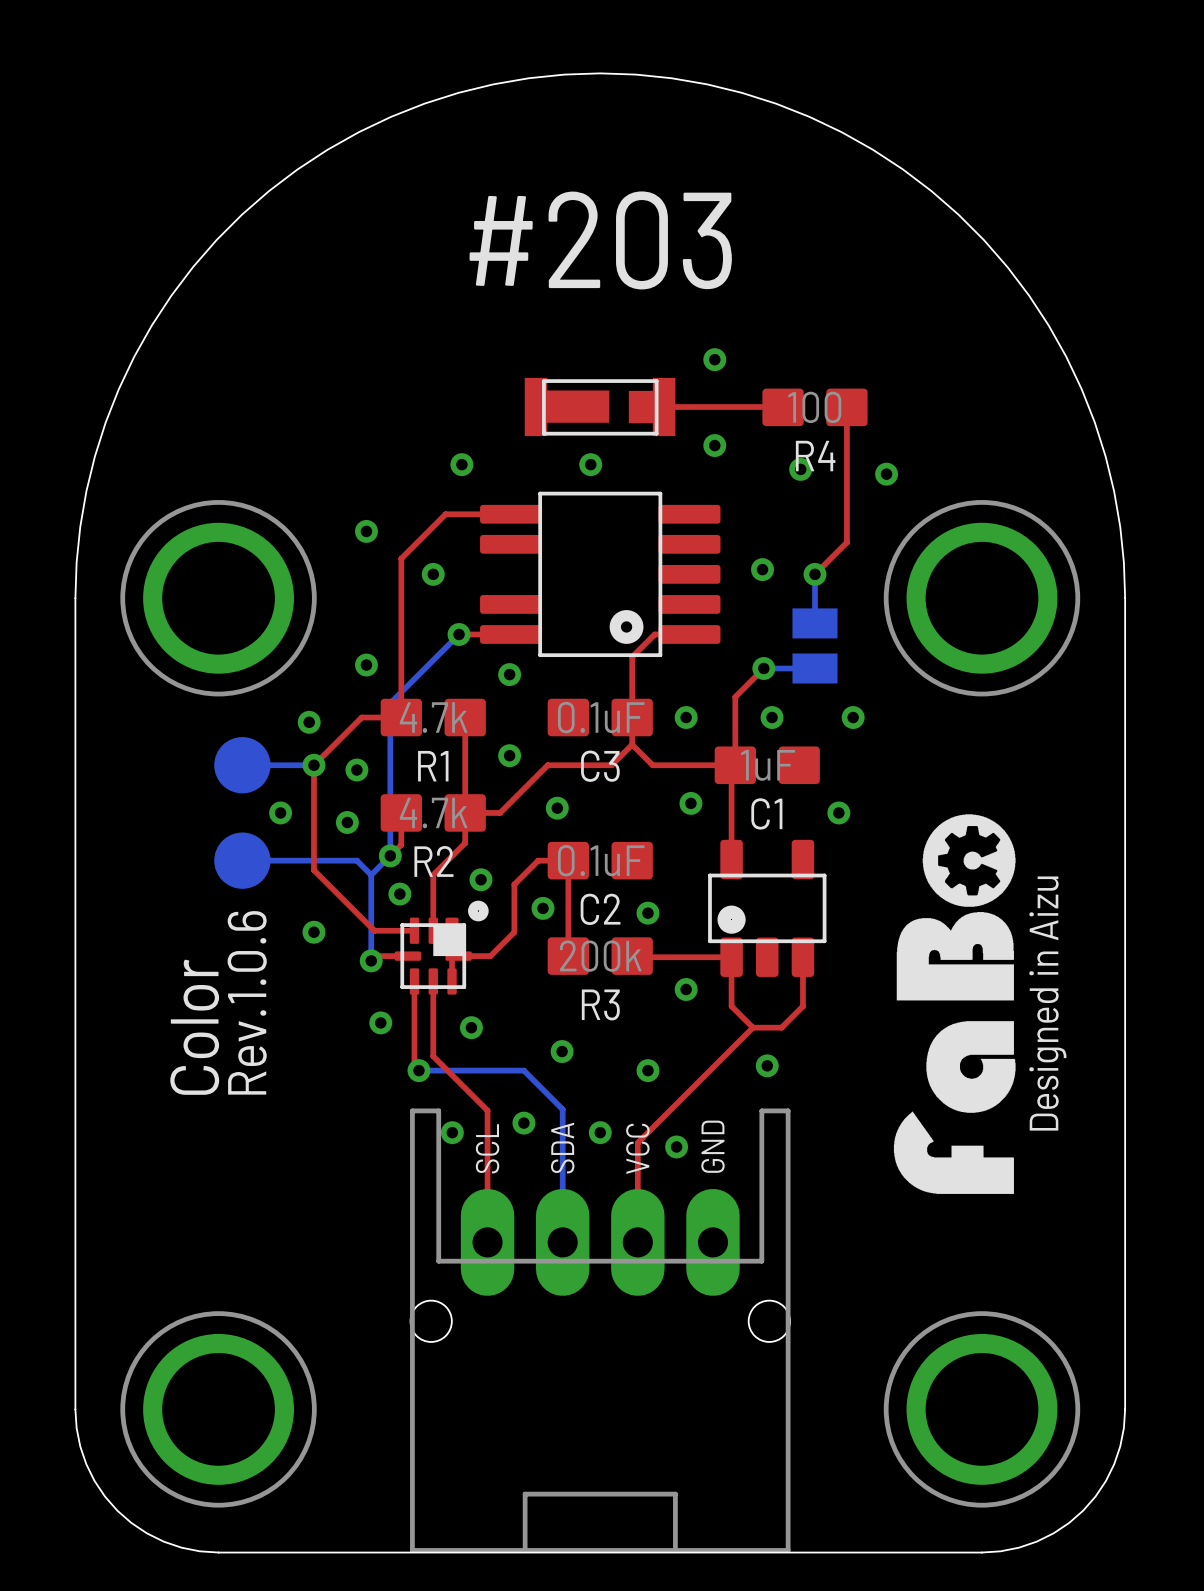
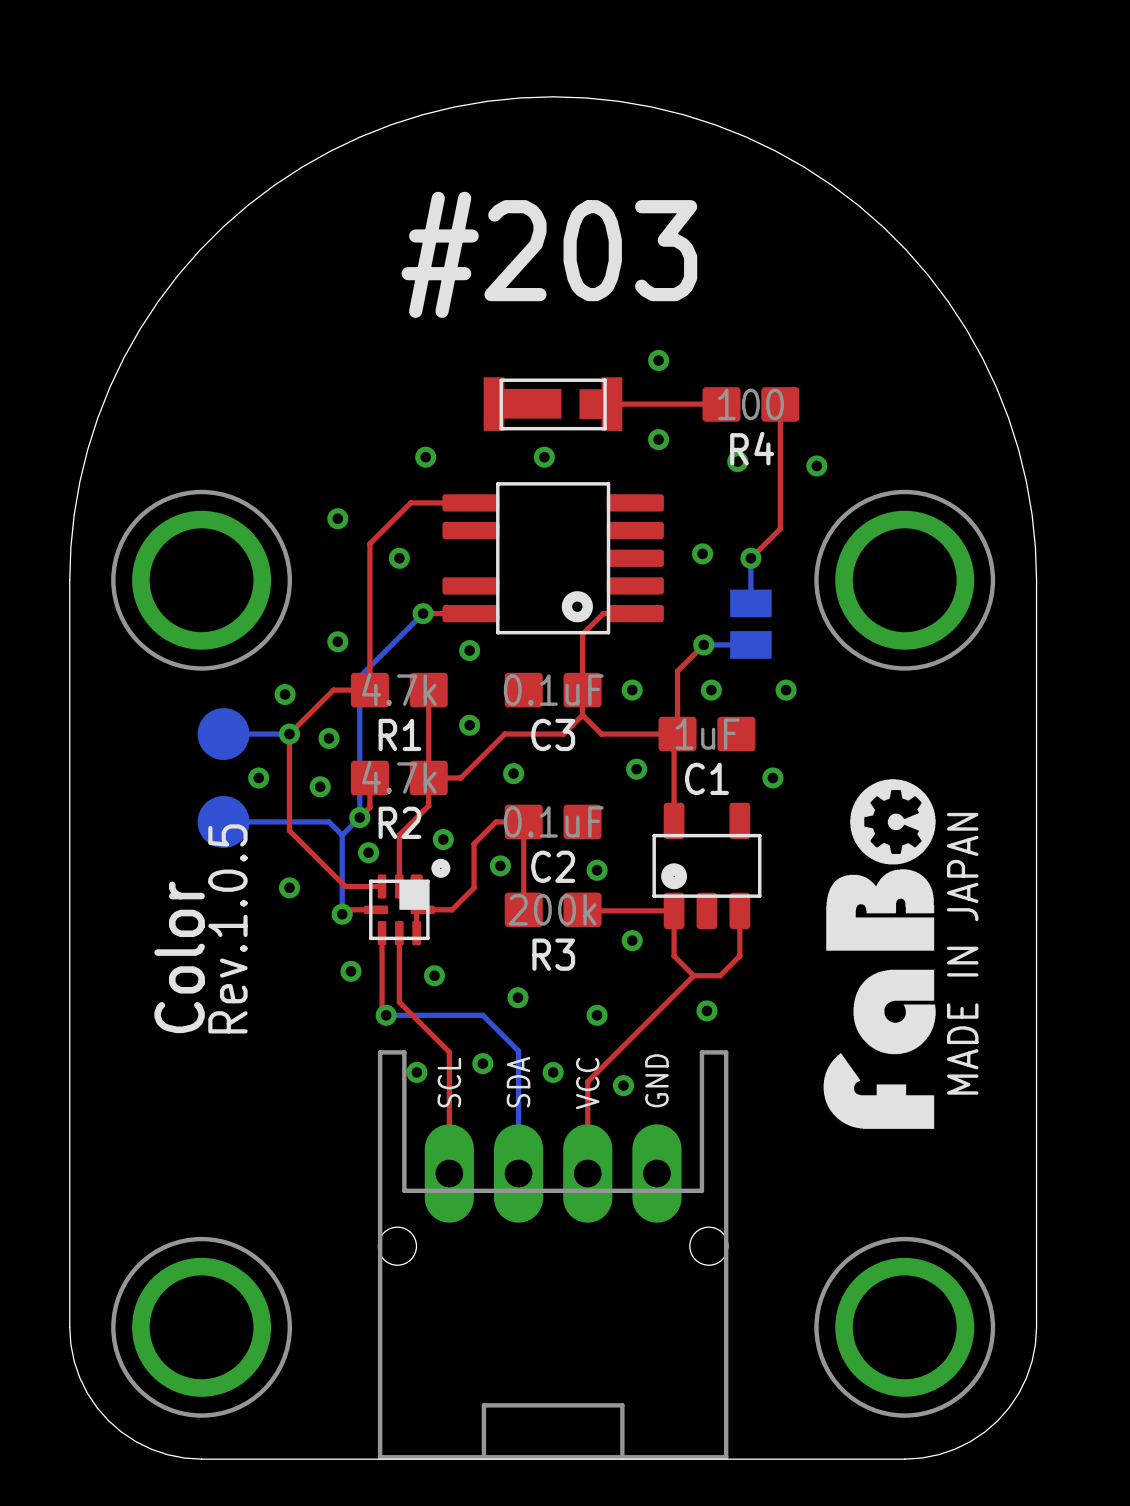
text: Rev.1.0.6 (247, 1002) -> Rev.1.0.5 (227, 928)
text: Designed in Aizu (1047, 1003) -> MADE IN JAPAN (962, 953)

